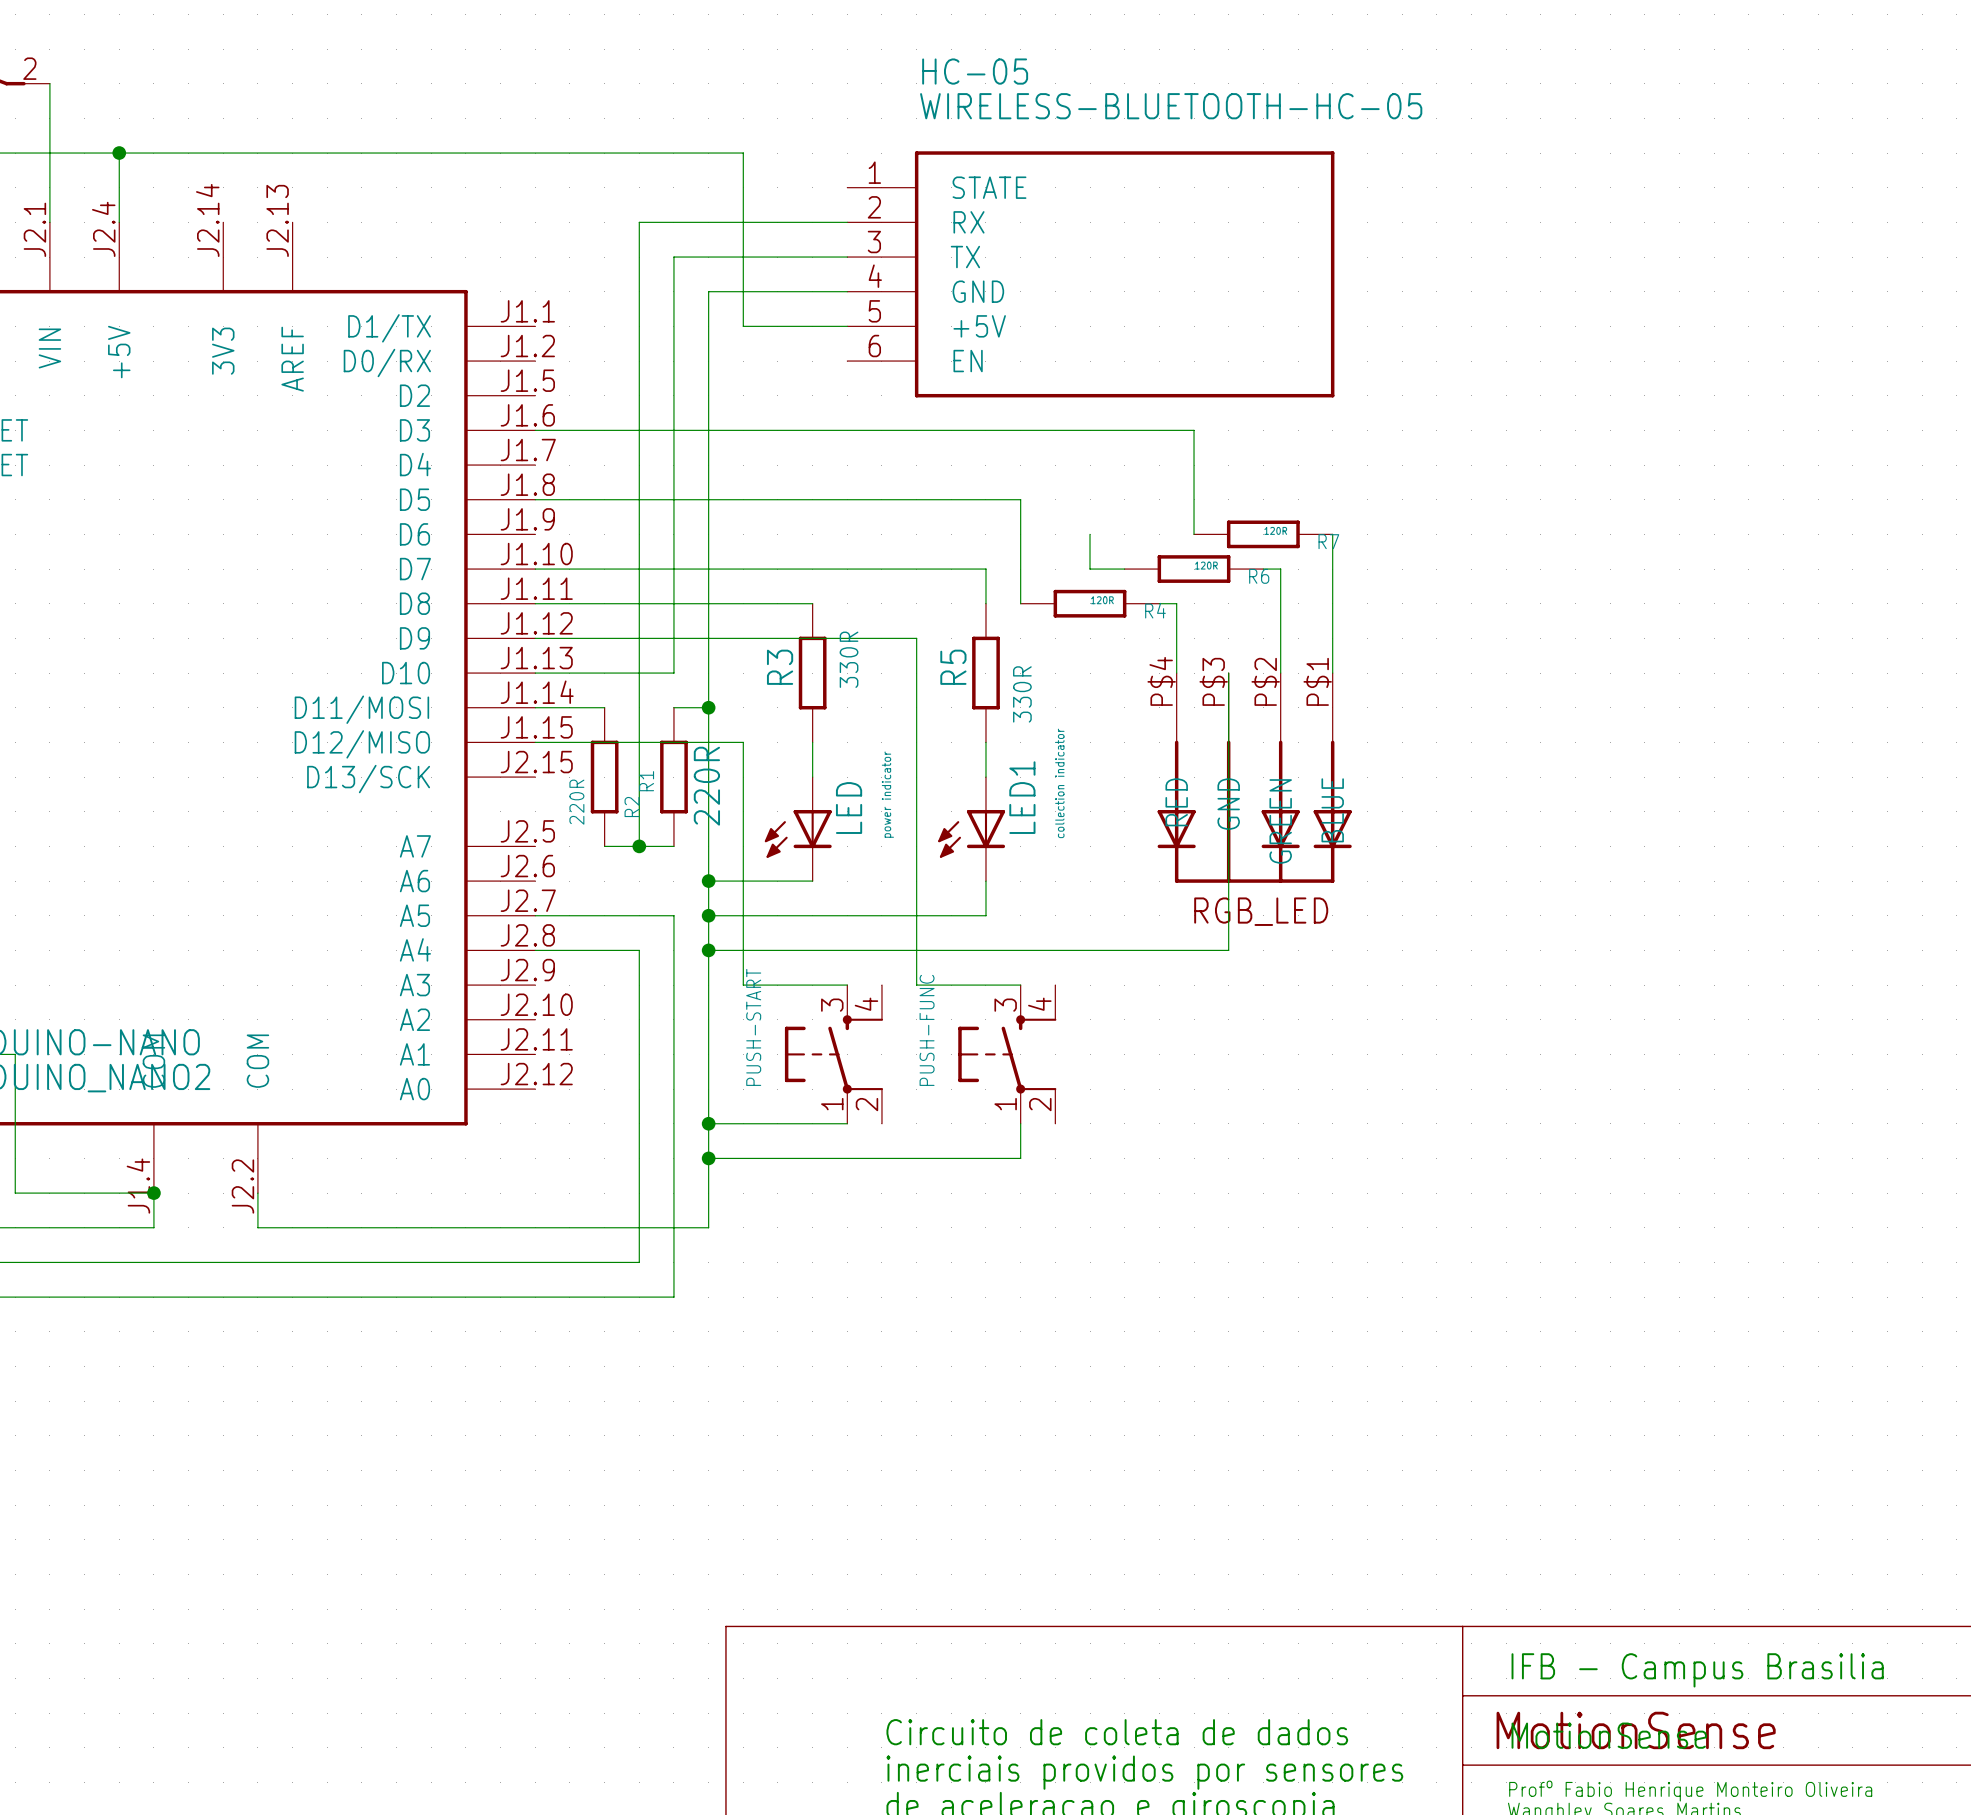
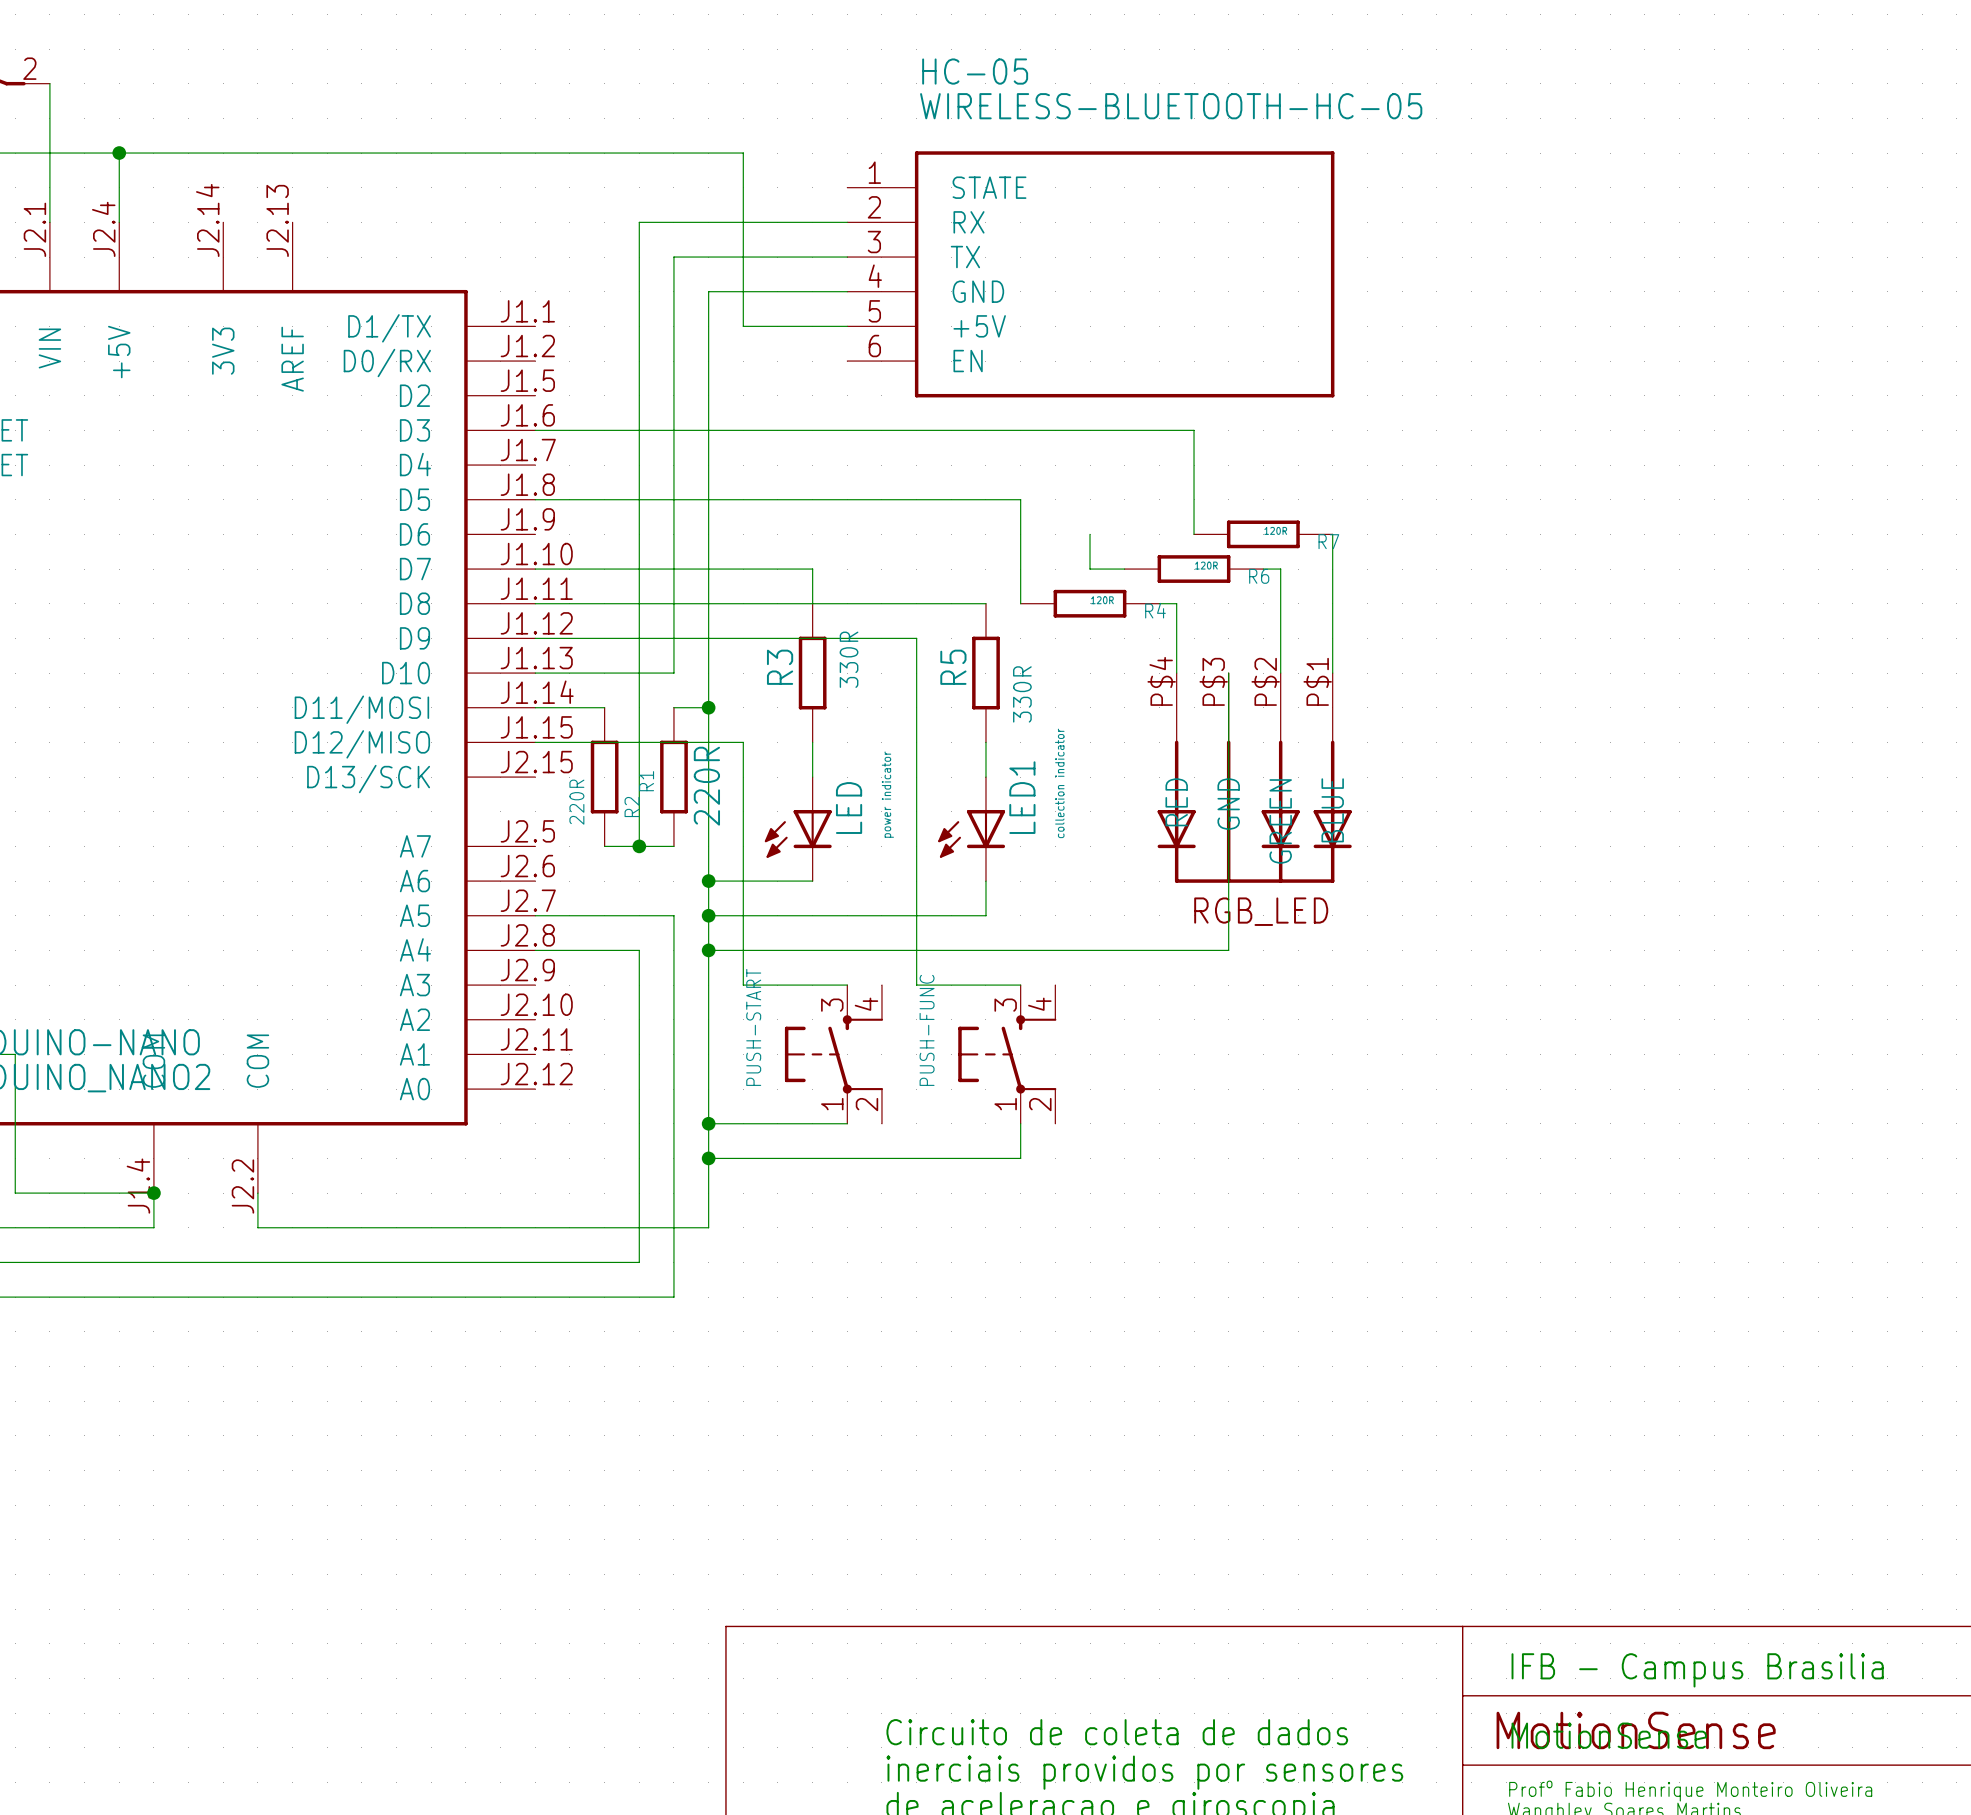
wire: (812, 569) (985, 569) (985, 603) -> (812, 569) (812, 603) (985, 603)

